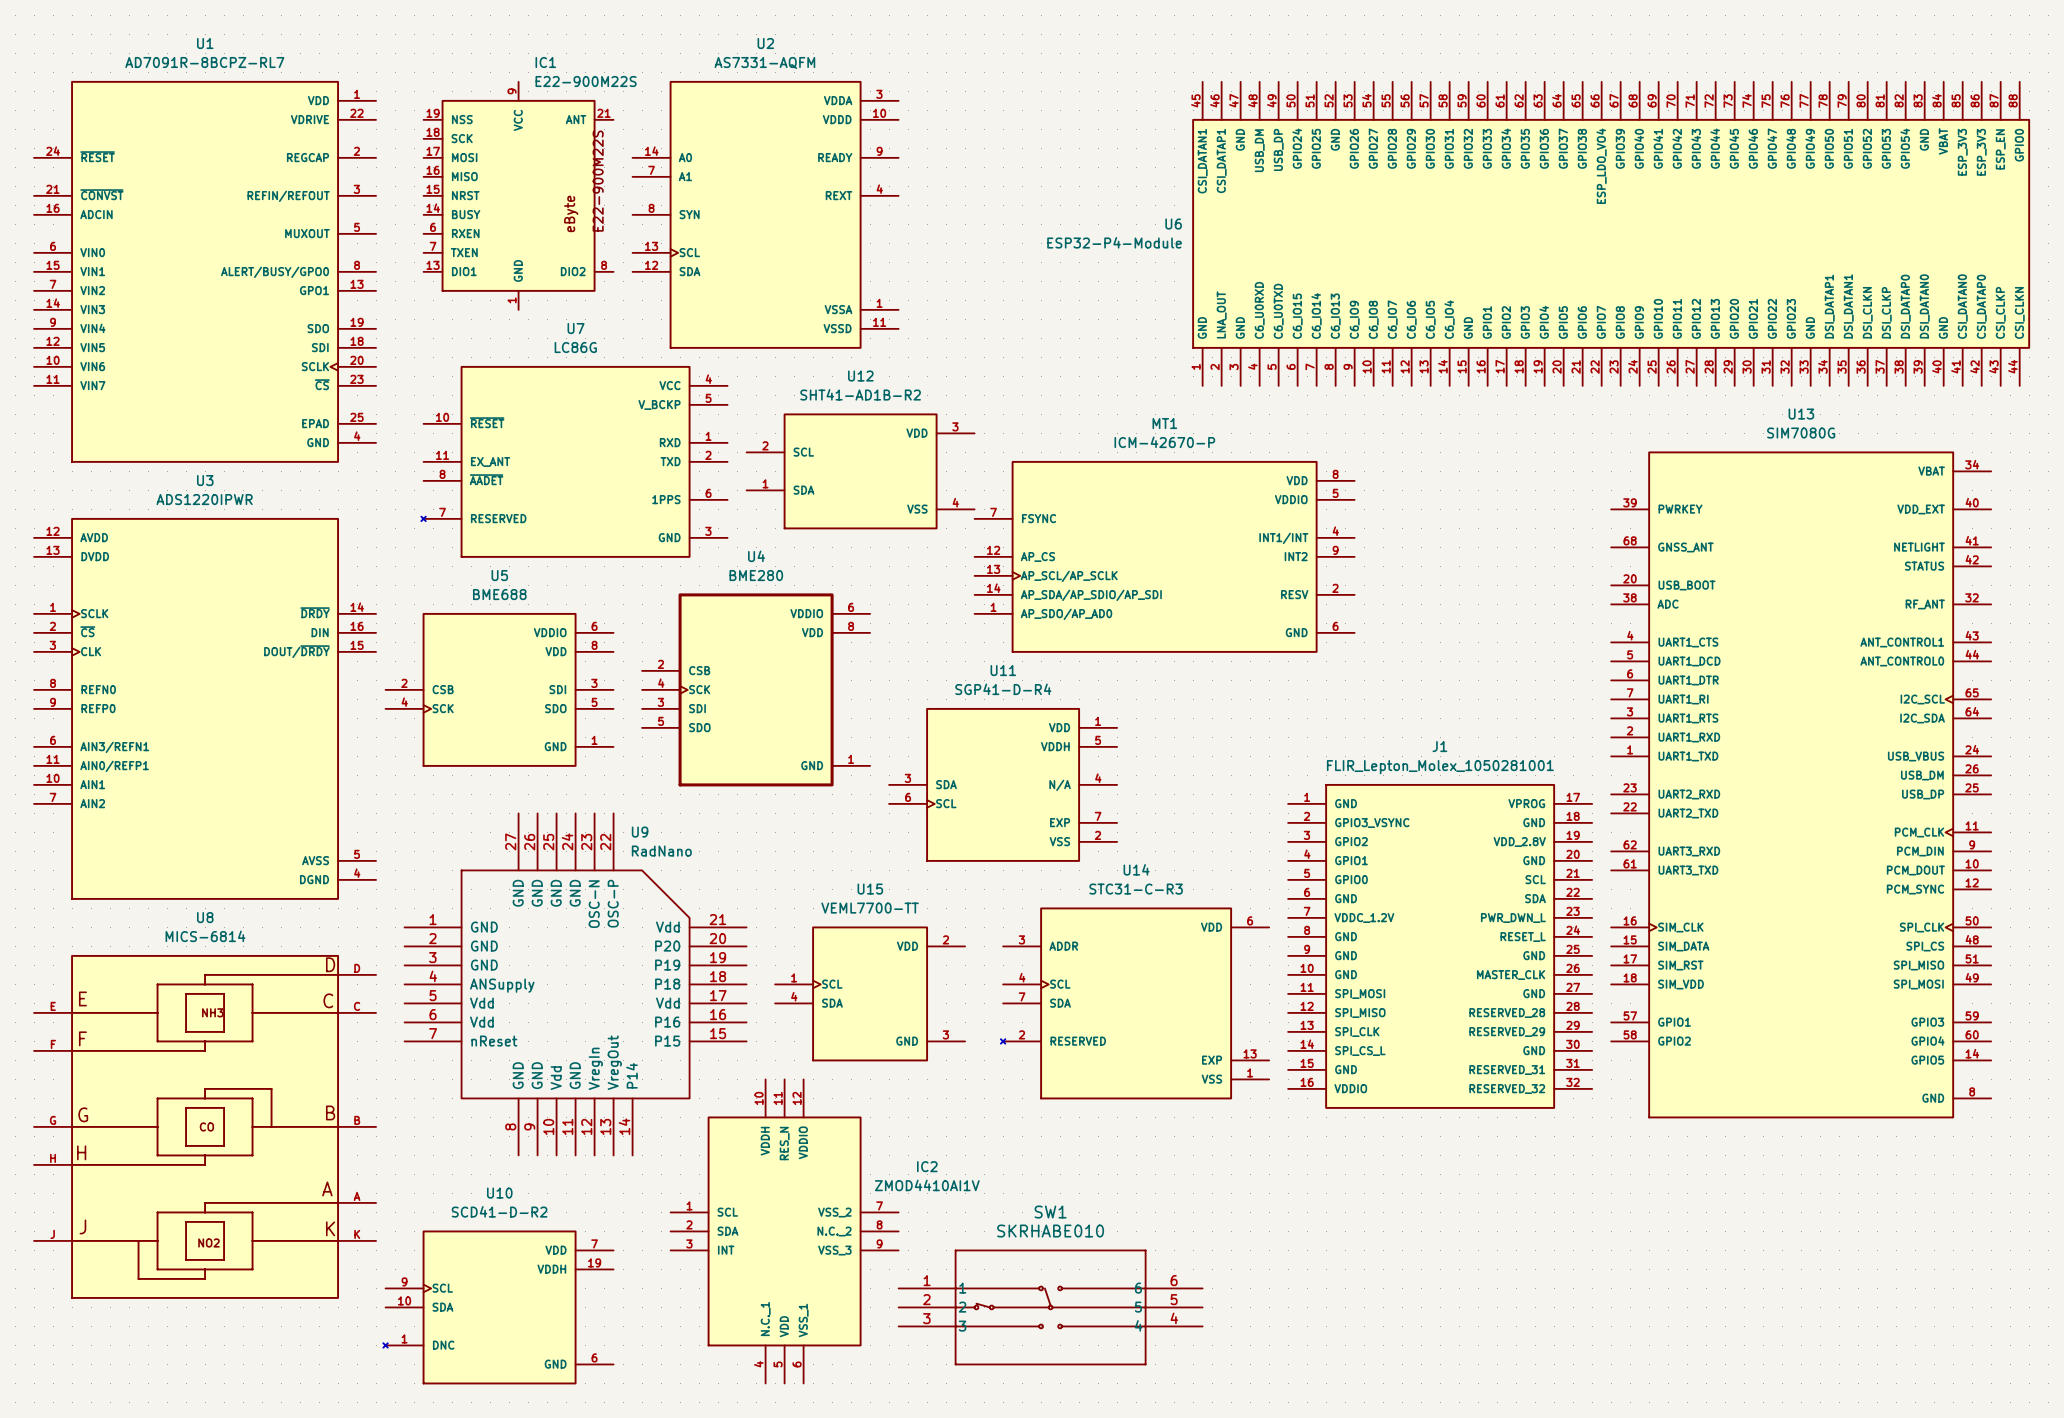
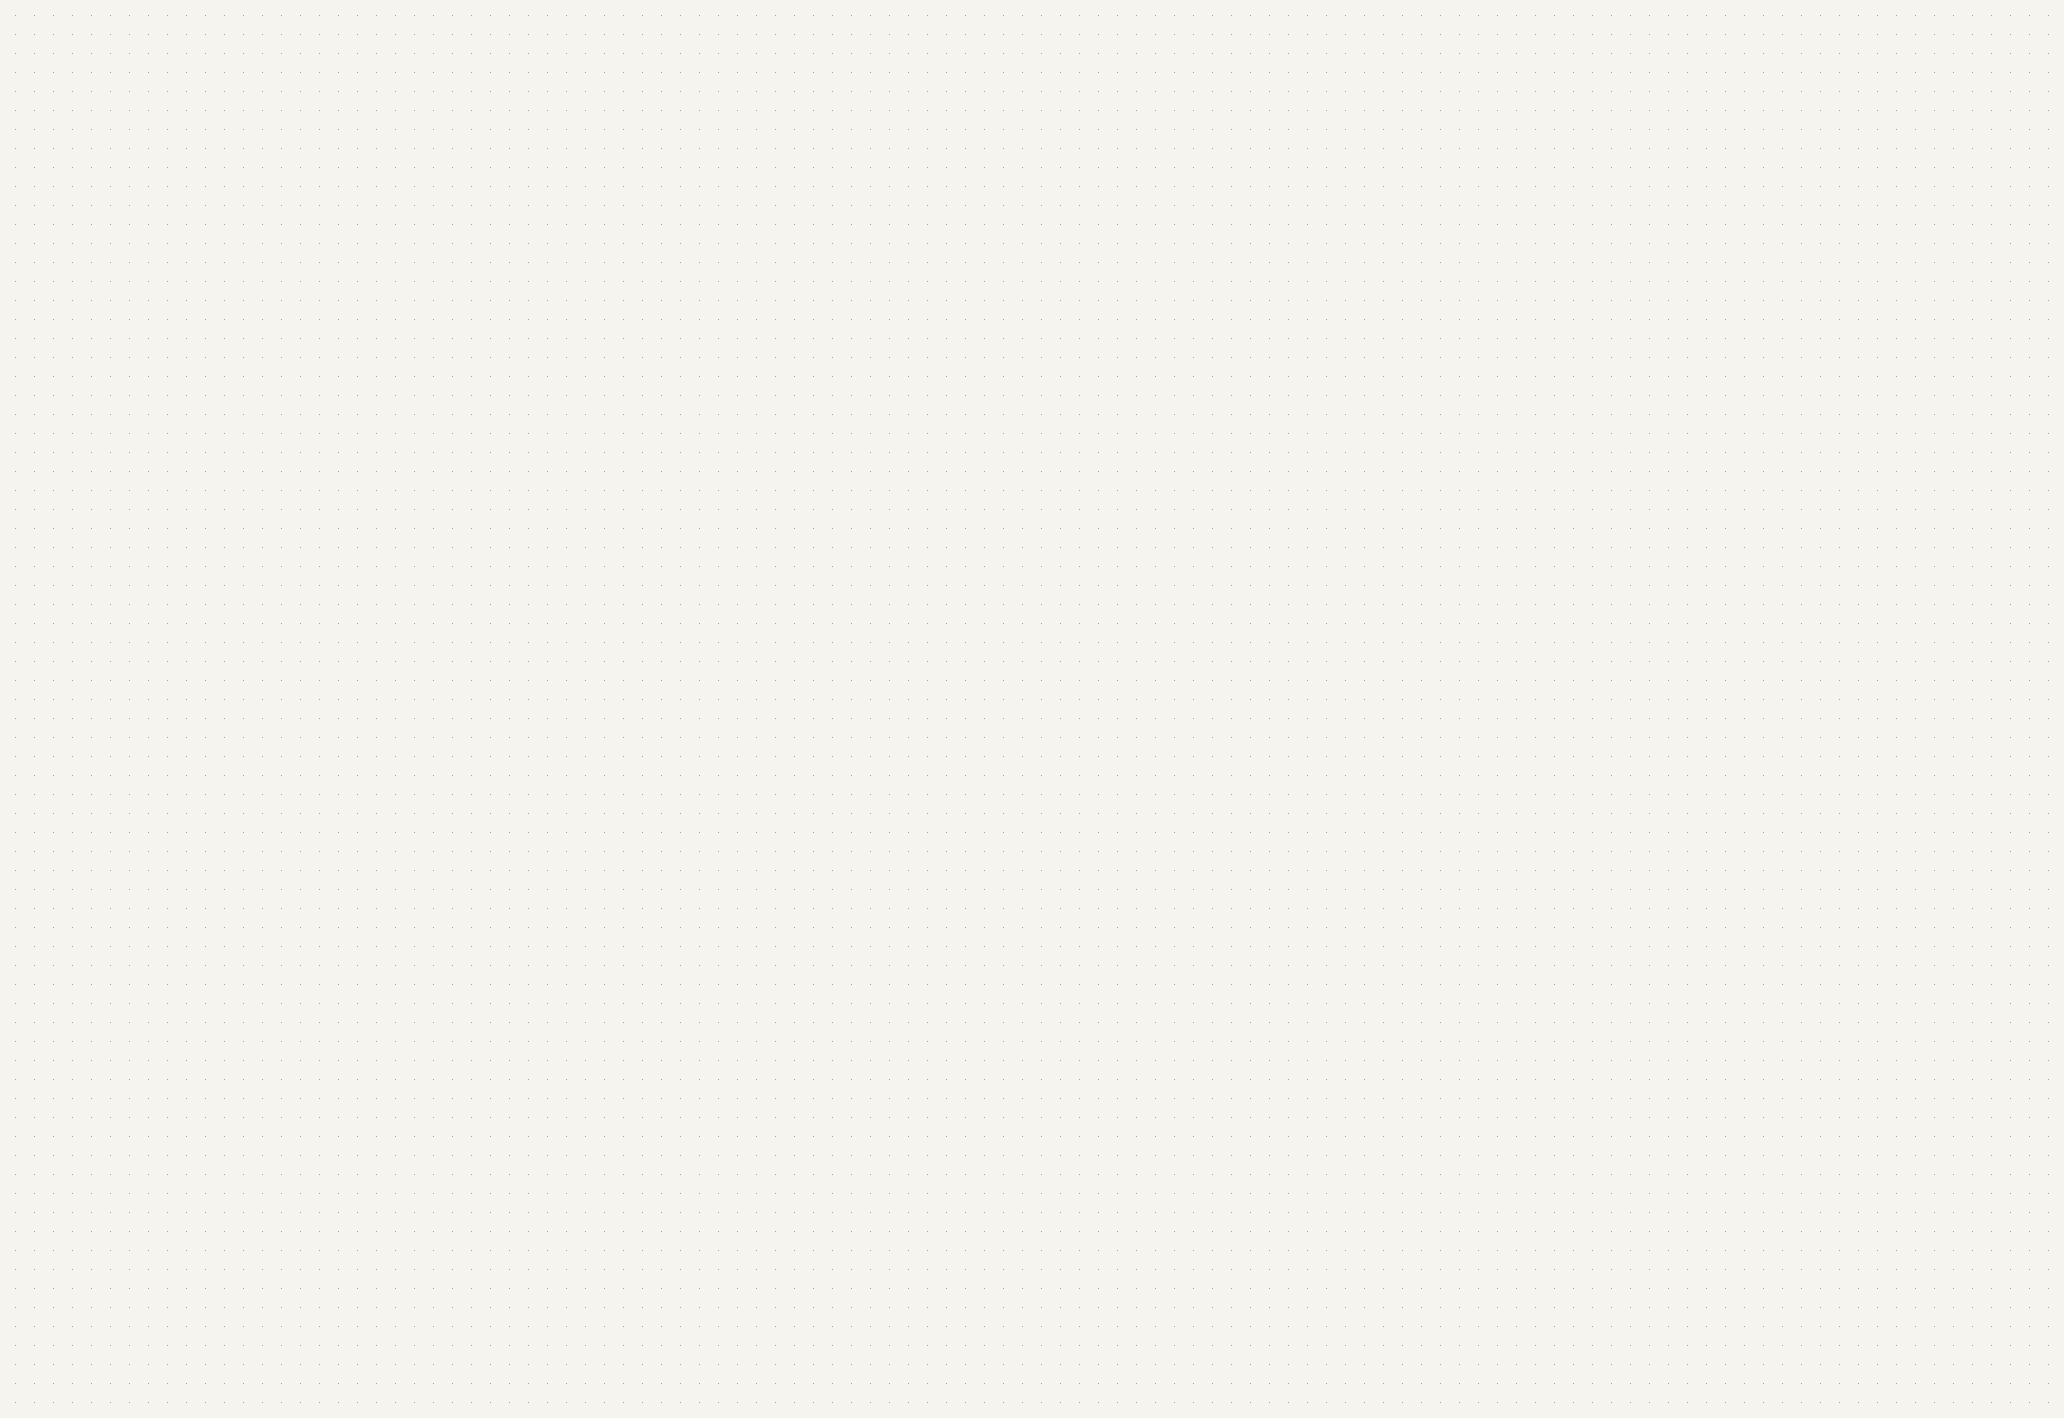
IC1: E22-900M22S (518, 195) -> none
U2: AS7331-AQFM (765, 214) -> none
U6: ESP32-P4-Module (1611, 233) -> none
U1: AD7091R-8BCPZ-RL7 (205, 271) -> none
U7: LC86G (574, 461) -> none
U12: SHT41-AD1B-R2 (860, 471) -> none
MT1: ICM-42670-P (1164, 556) -> none
U5: BME688 (499, 689) -> none
U4: BME280 (756, 689) -> none
U3: ADS1220IPWR (205, 708) -> none
U11: SGP41-D-R4 (1003, 784) -> none
U13: SIM7080G (1801, 784) -> none
J1: FLIR_Lepton_Molex_1050281001 (1440, 946) -> none
U9: RadNano (575, 984) -> none
U15: VEML7700-TT (870, 993) -> none
U14: STC31-C-R3 (1134, 1003) -> none
U8: MICS-6814 (205, 1126) -> none
IC2: ZMOD4410AI1V (784, 1231) -> none
U10: SCD41-D-R2 (498, 1307) -> none
SW1: SKRHABE010 (1050, 1307) -> none

